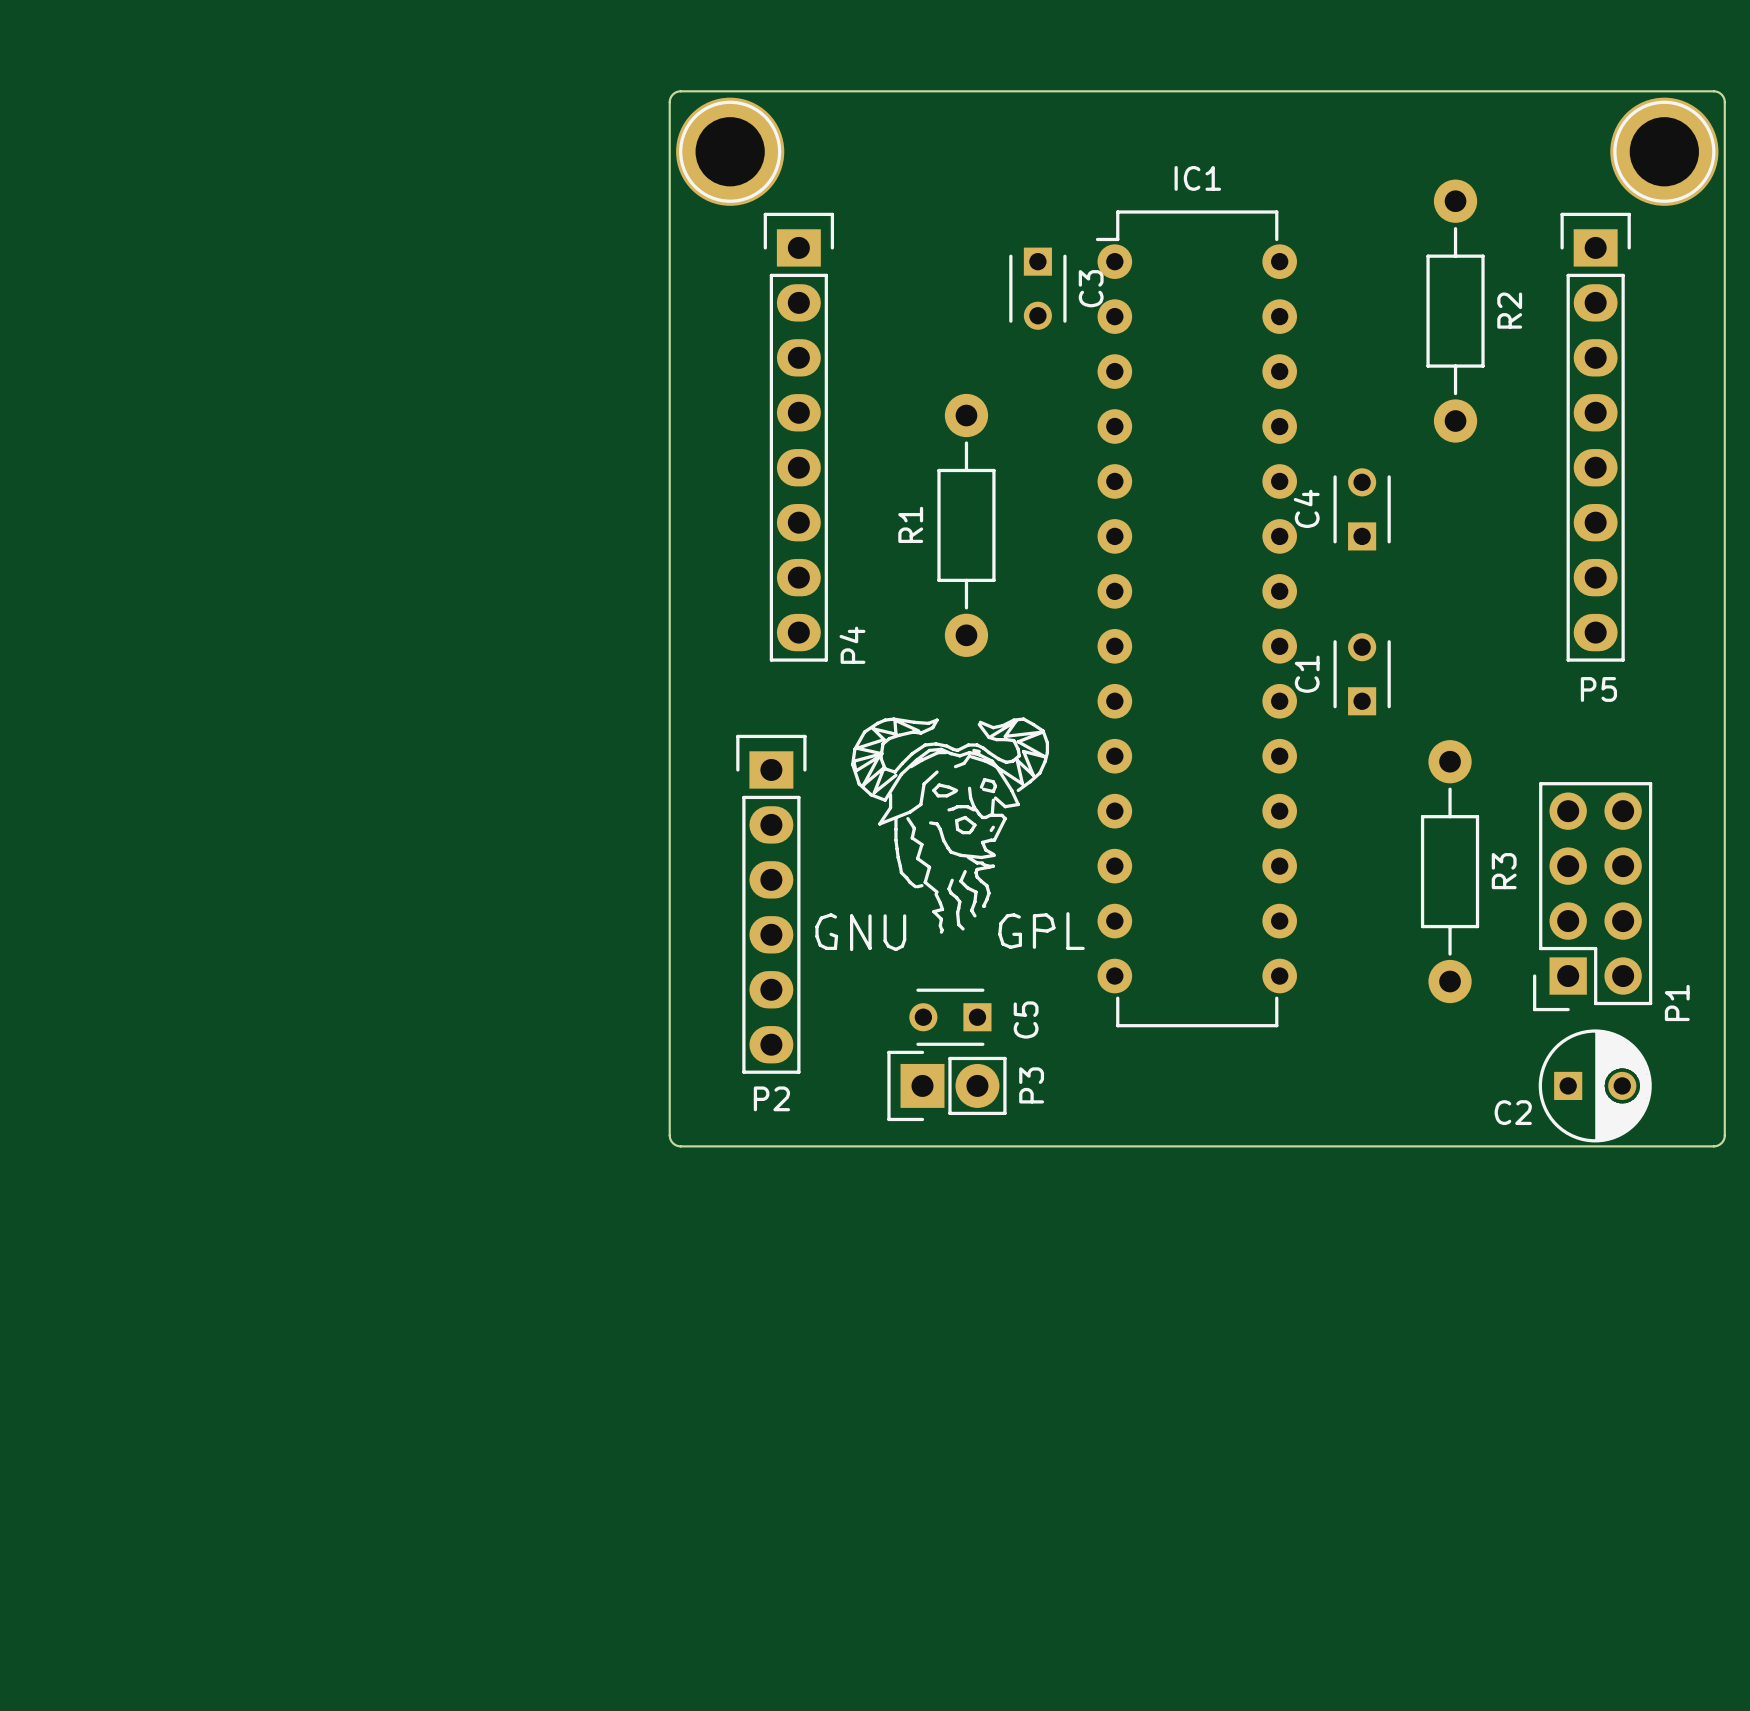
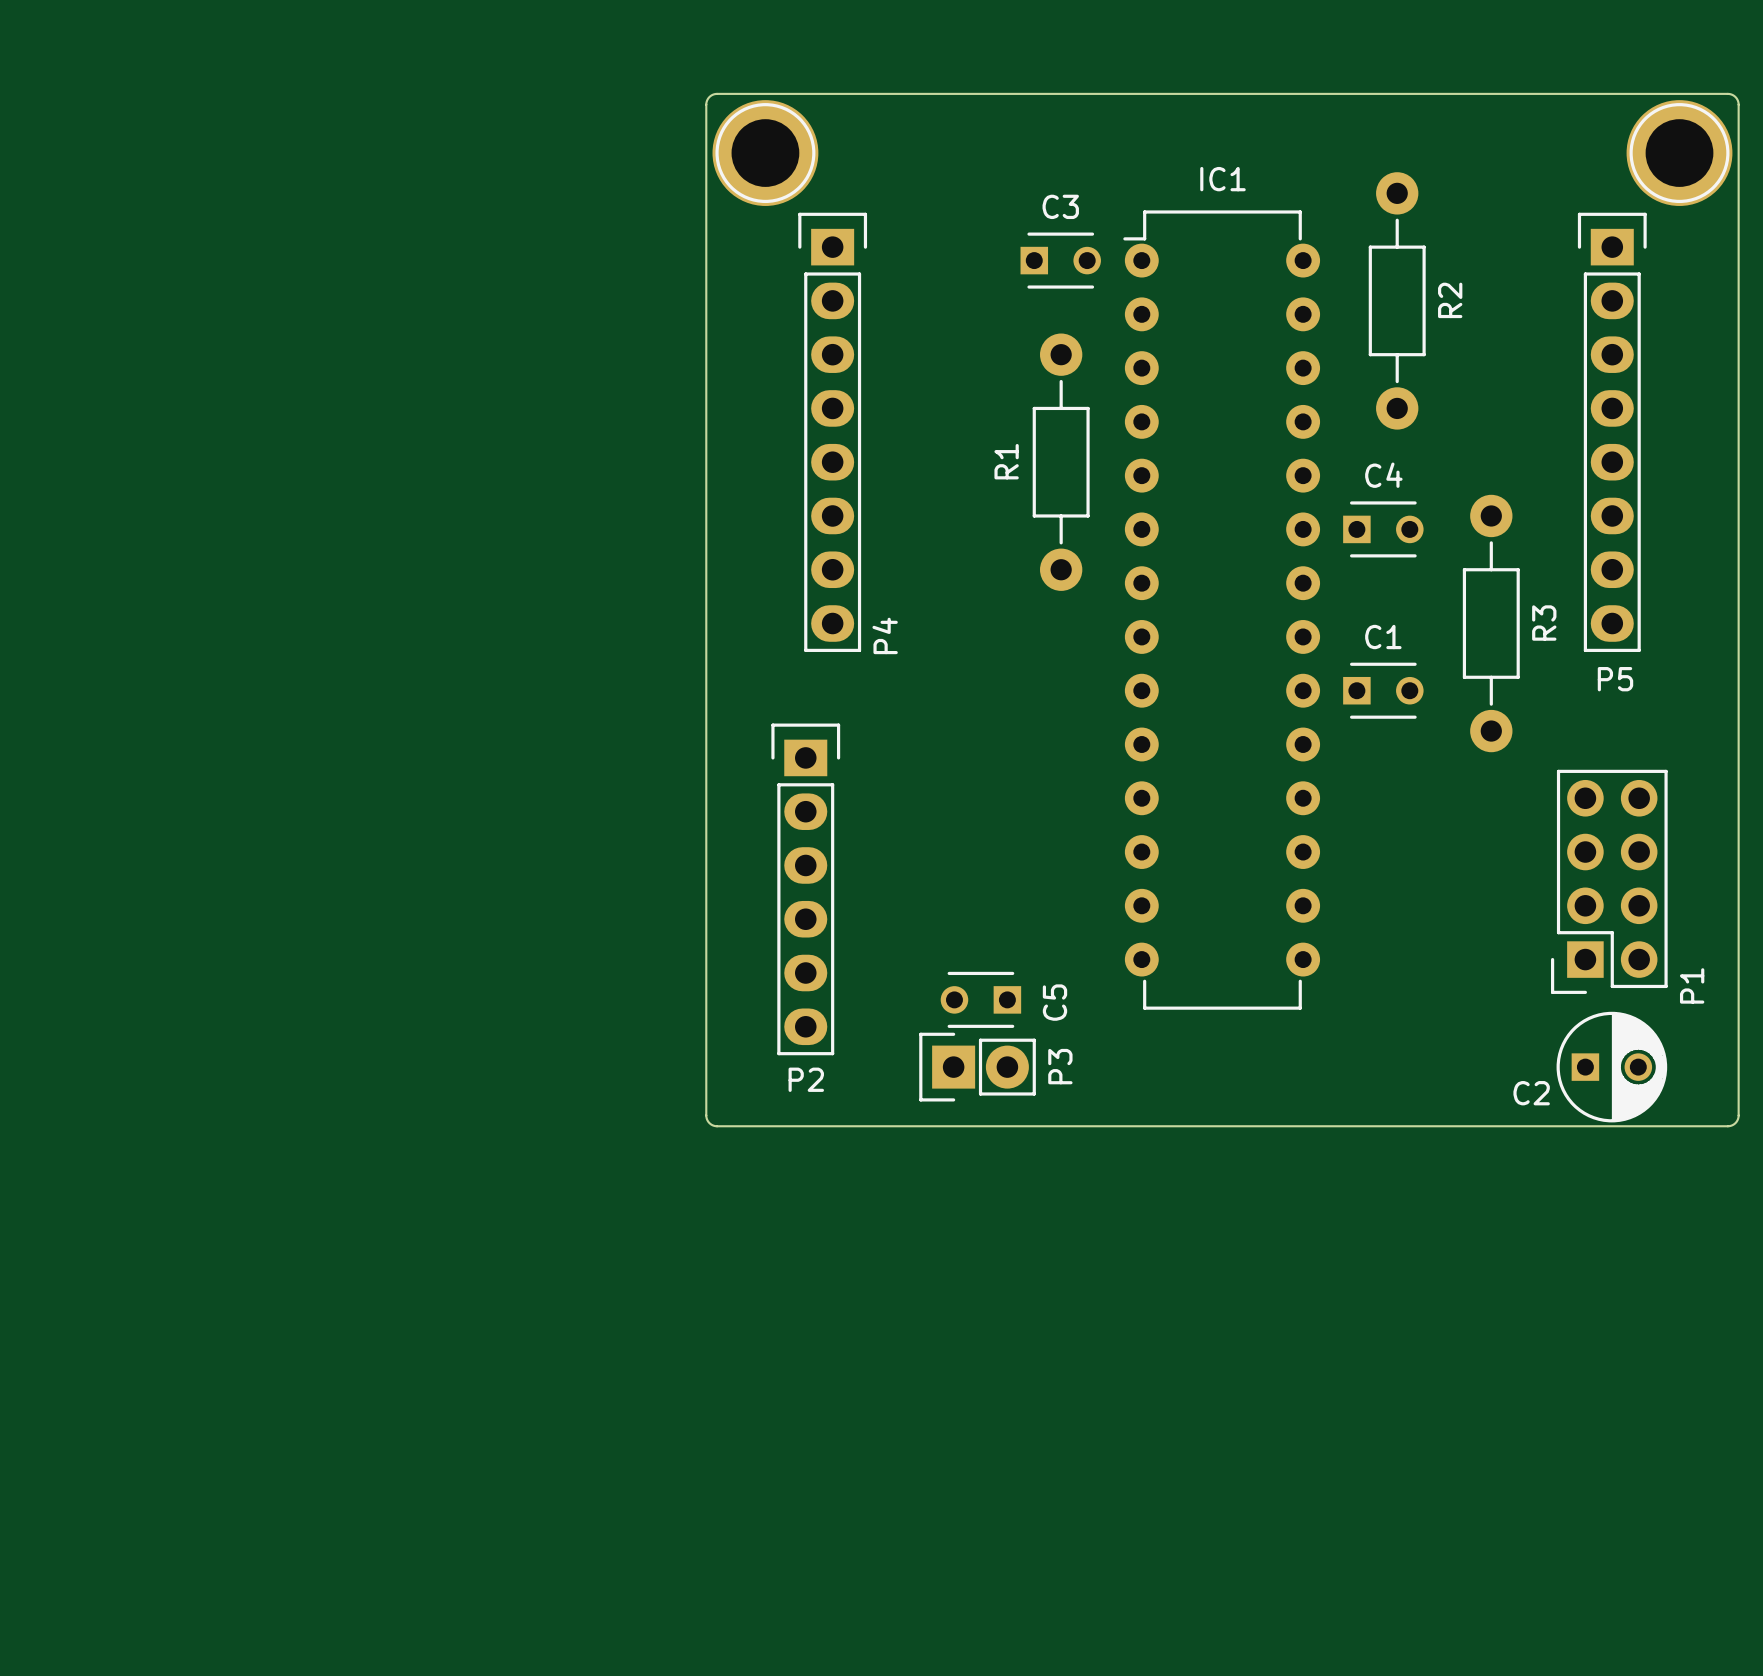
C3 rotation: 0° (1037, 288) -> 90° counterclockwise (1060, 260)
R2 position: (1455, 311) -> (1397, 300)
C4 rotation: 0° (1362, 509) -> 90° clockwise (1383, 529)
R1 position: (966, 525) -> (1061, 462)
C1 rotation: 0° (1362, 674) -> 90° clockwise (1383, 690)
drawing: [815, 717, 1085, 952] -> none
R3 position: (1450, 871) -> (1491, 623)

